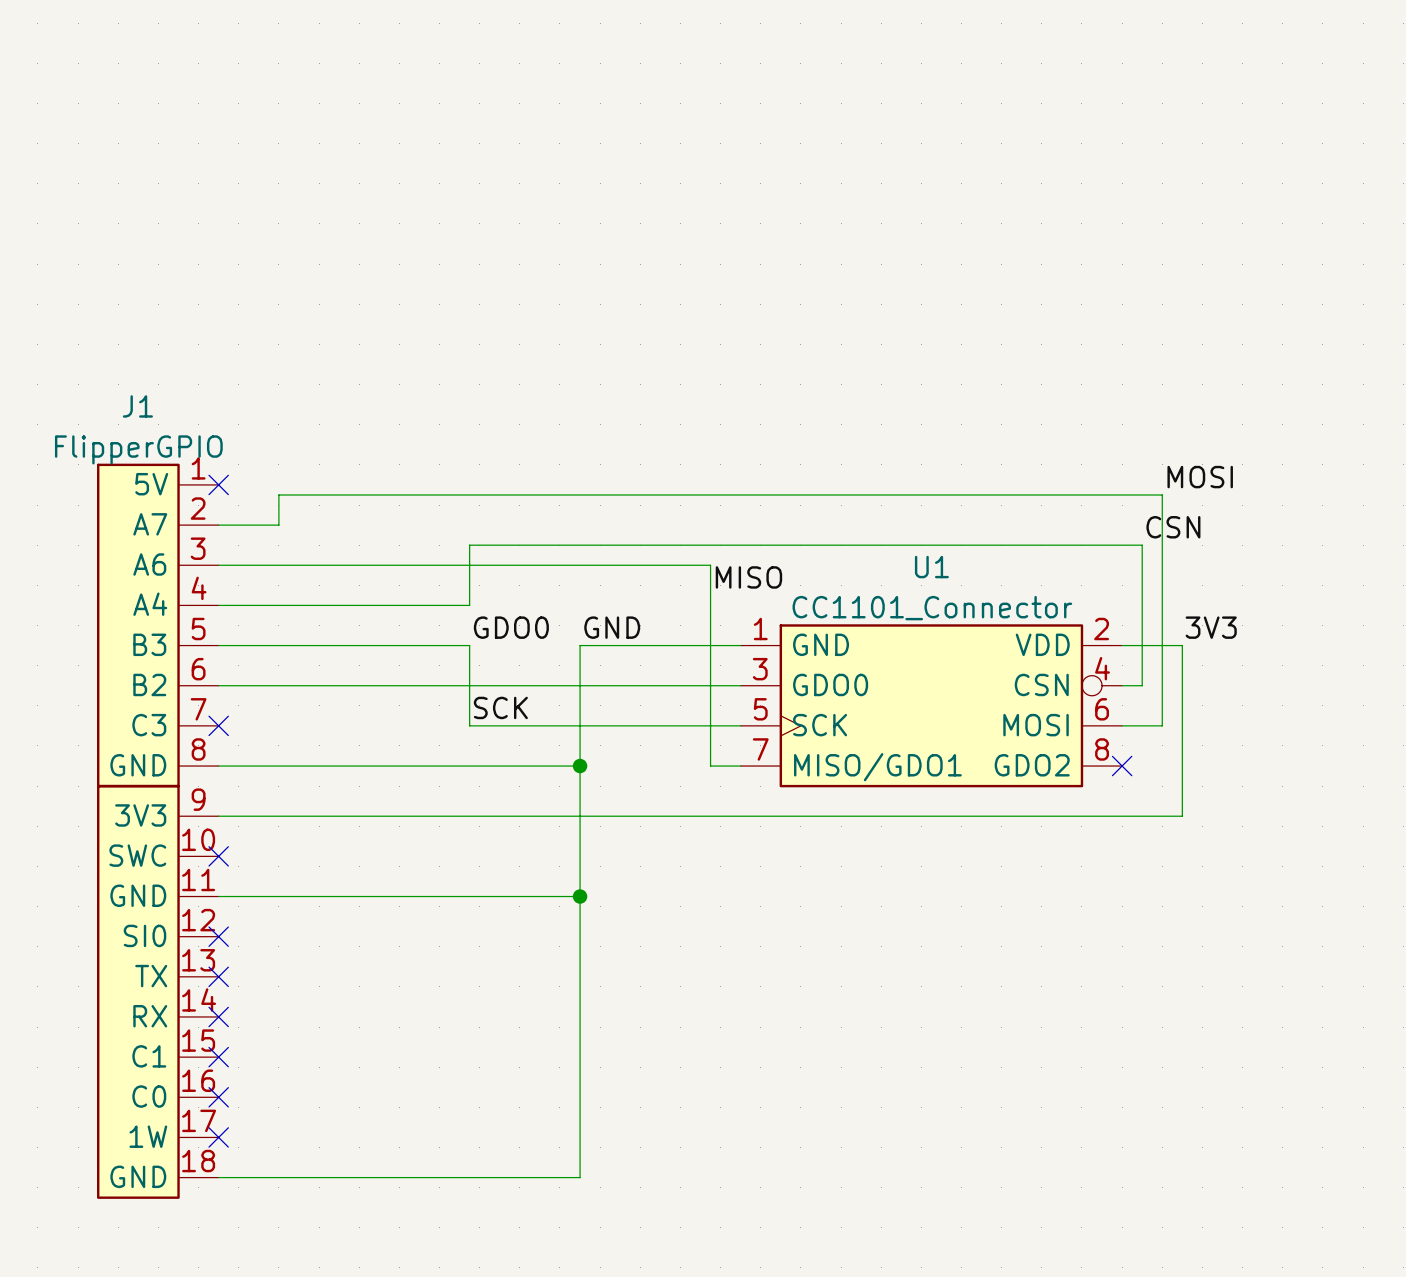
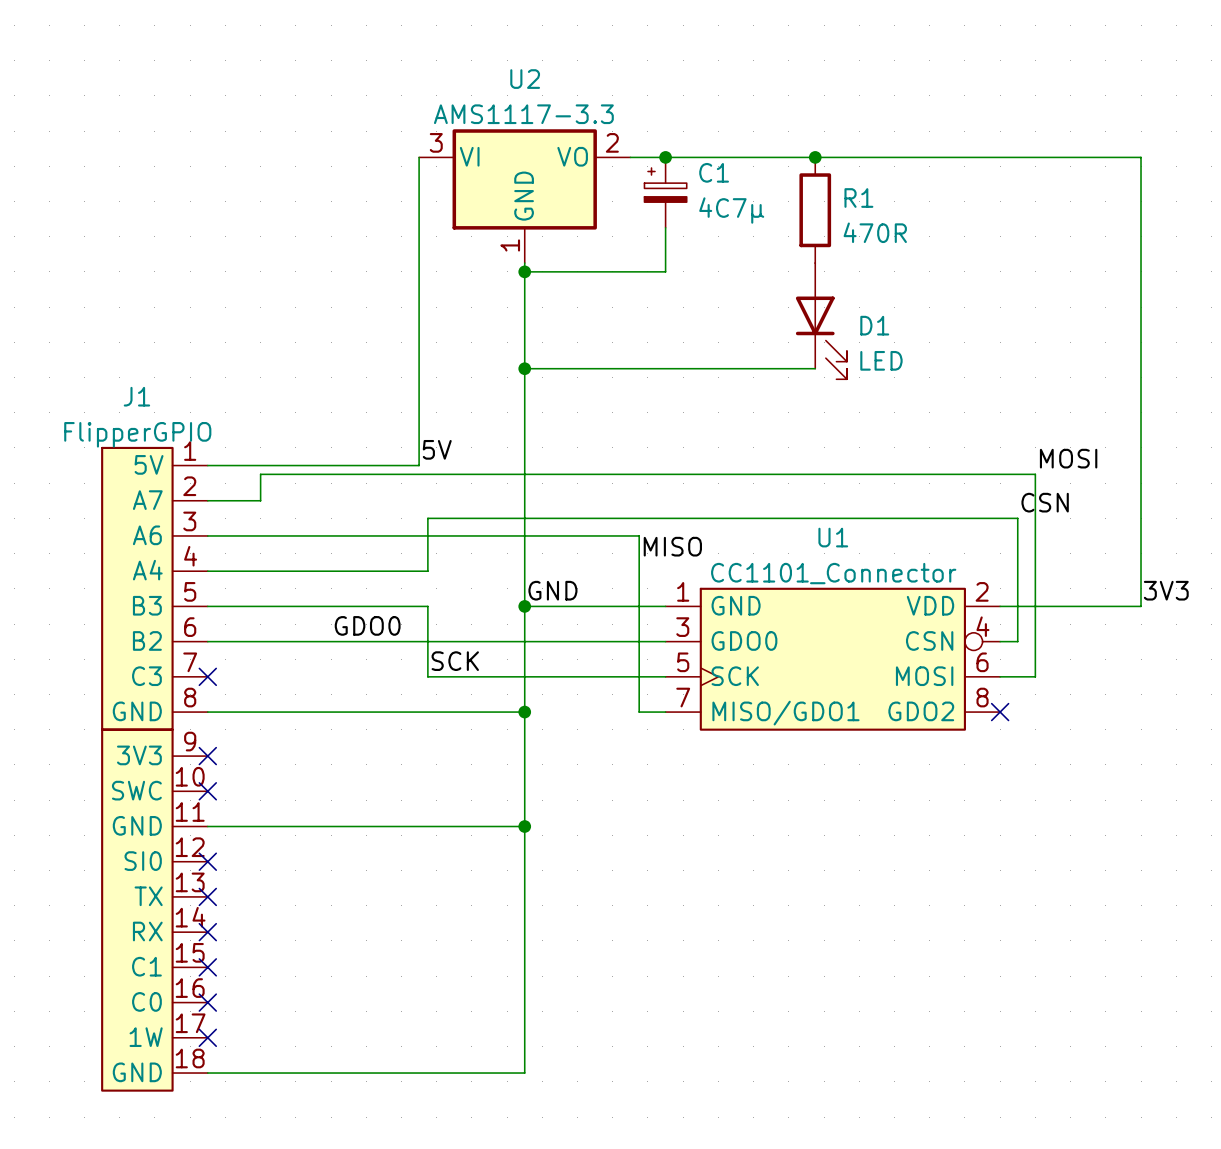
wire: none -> (419, 157) (419, 465) (207, 465)
junction: none -> (665, 157)
junction: none -> (815, 157)
C1: none -> 4C7µ (665, 192)
U2: none -> AMS1117-3.3 (524, 196)
R1: none -> 470R (815, 210)
wire: none -> (665, 227) (665, 271) (524, 271)
wire: none -> (524, 263) (524, 606)
junction: none -> (524, 271)
D1: none -> LED (821, 321)
wire: none -> (524, 368) (815, 368)
junction: none -> (524, 368)
label: none -> 5V (437, 449)
no-connect mark: (218, 484) -> none
label position: GDO0 (511, 627) -> GDO0 (367, 625)
label position: 3V3 (1211, 627) -> 3V3 (1166, 590)
junction: none -> (524, 606)
wire: (1182, 645) (1182, 816) (218, 816) -> (1052, 606) (1141, 606) (1141, 157) (630, 157)
no-connect mark: none -> (207, 756)

